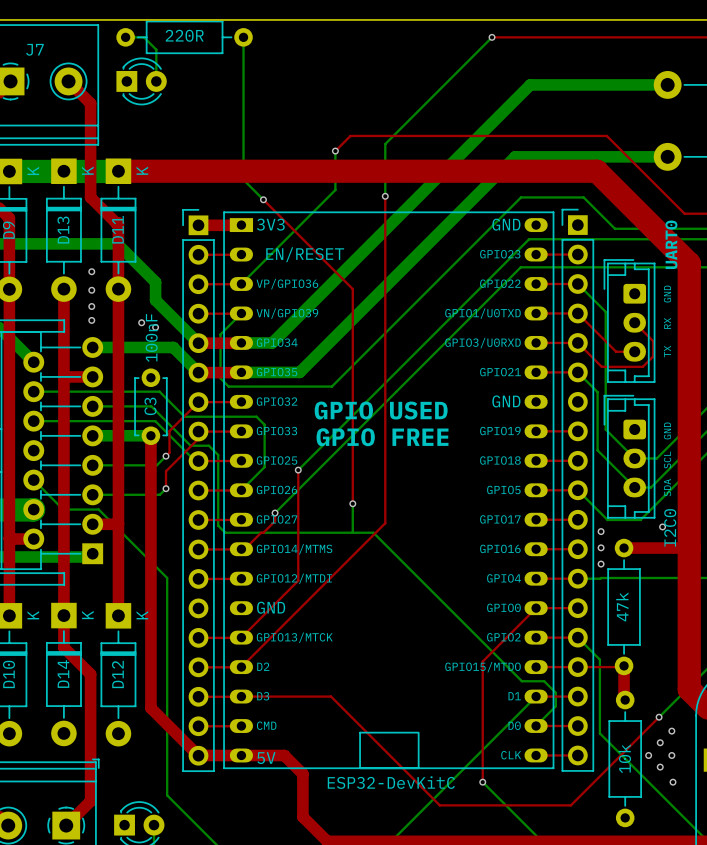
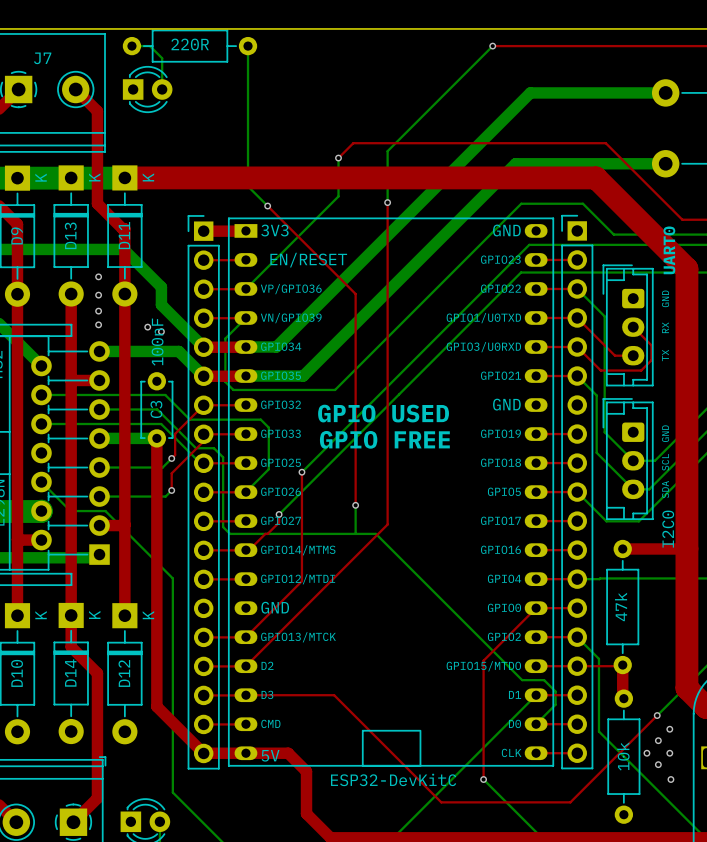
via: (662, 526) -> none
via: (601, 531) -> none
via: (601, 547) -> none
via: (601, 564) -> none

